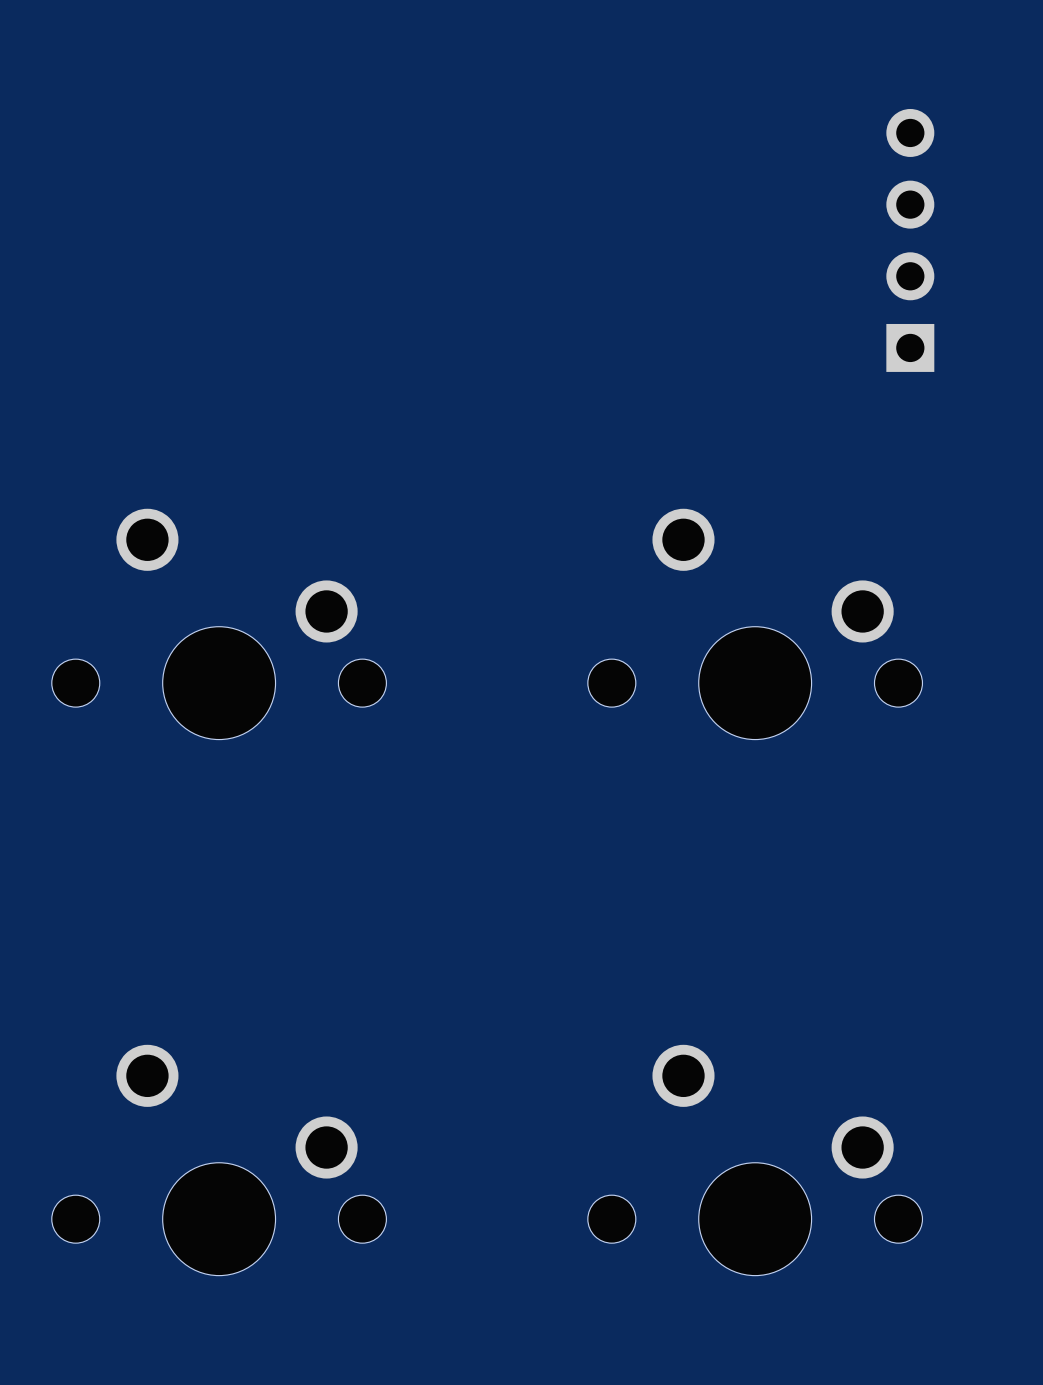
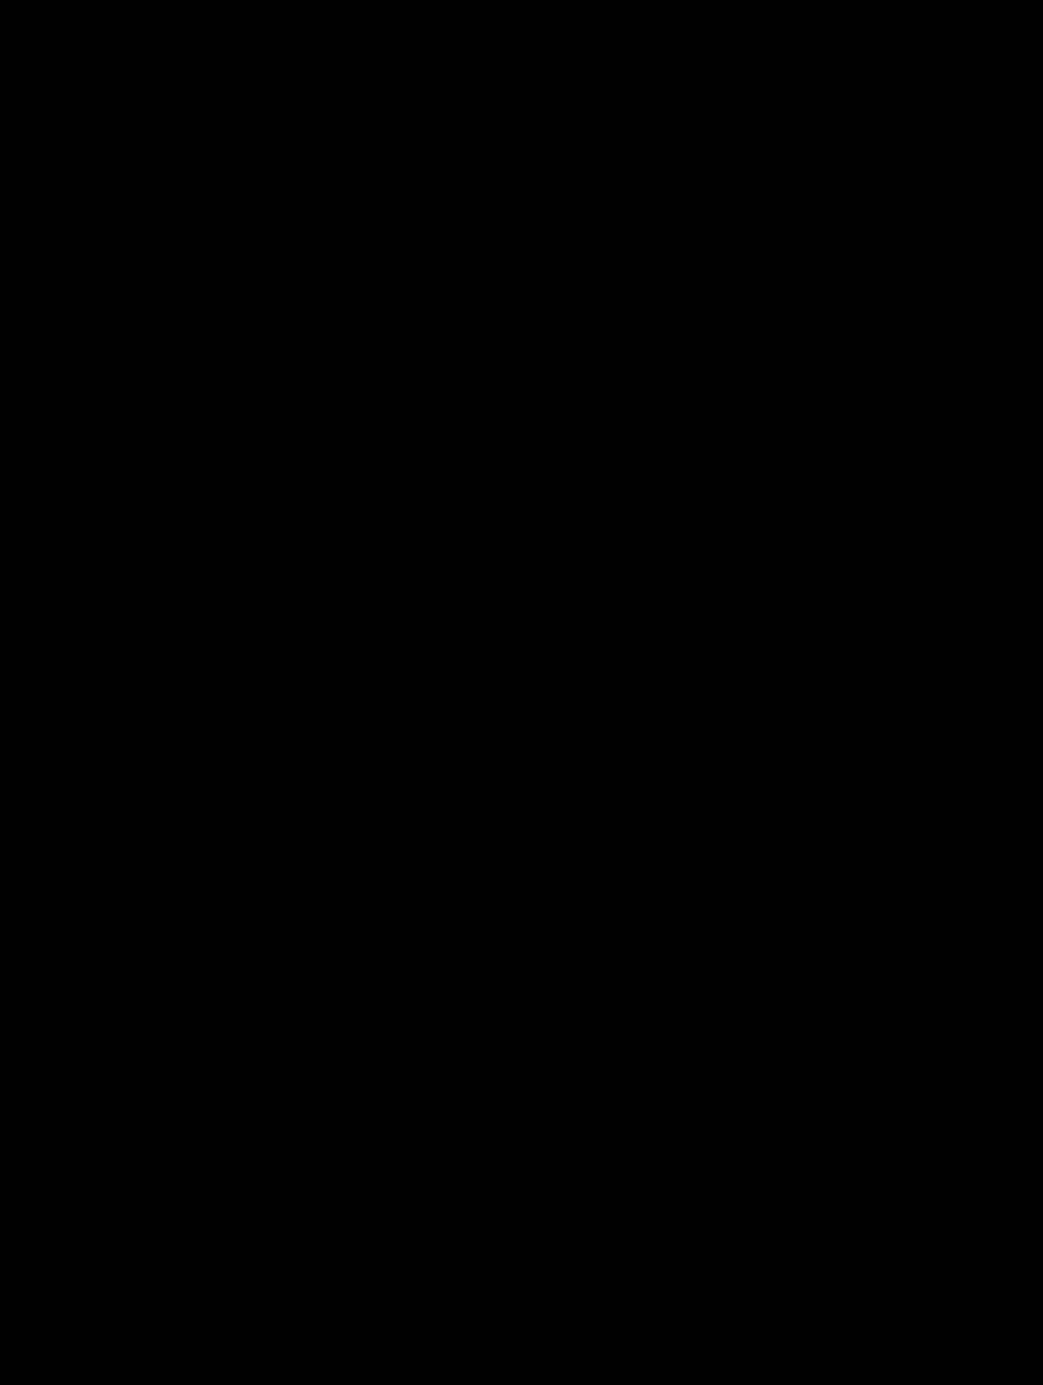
part: (910, 240) -> none
part: (219, 624) -> none
part: (755, 624) -> none
part: (219, 1160) -> none
part: (755, 1160) -> none

